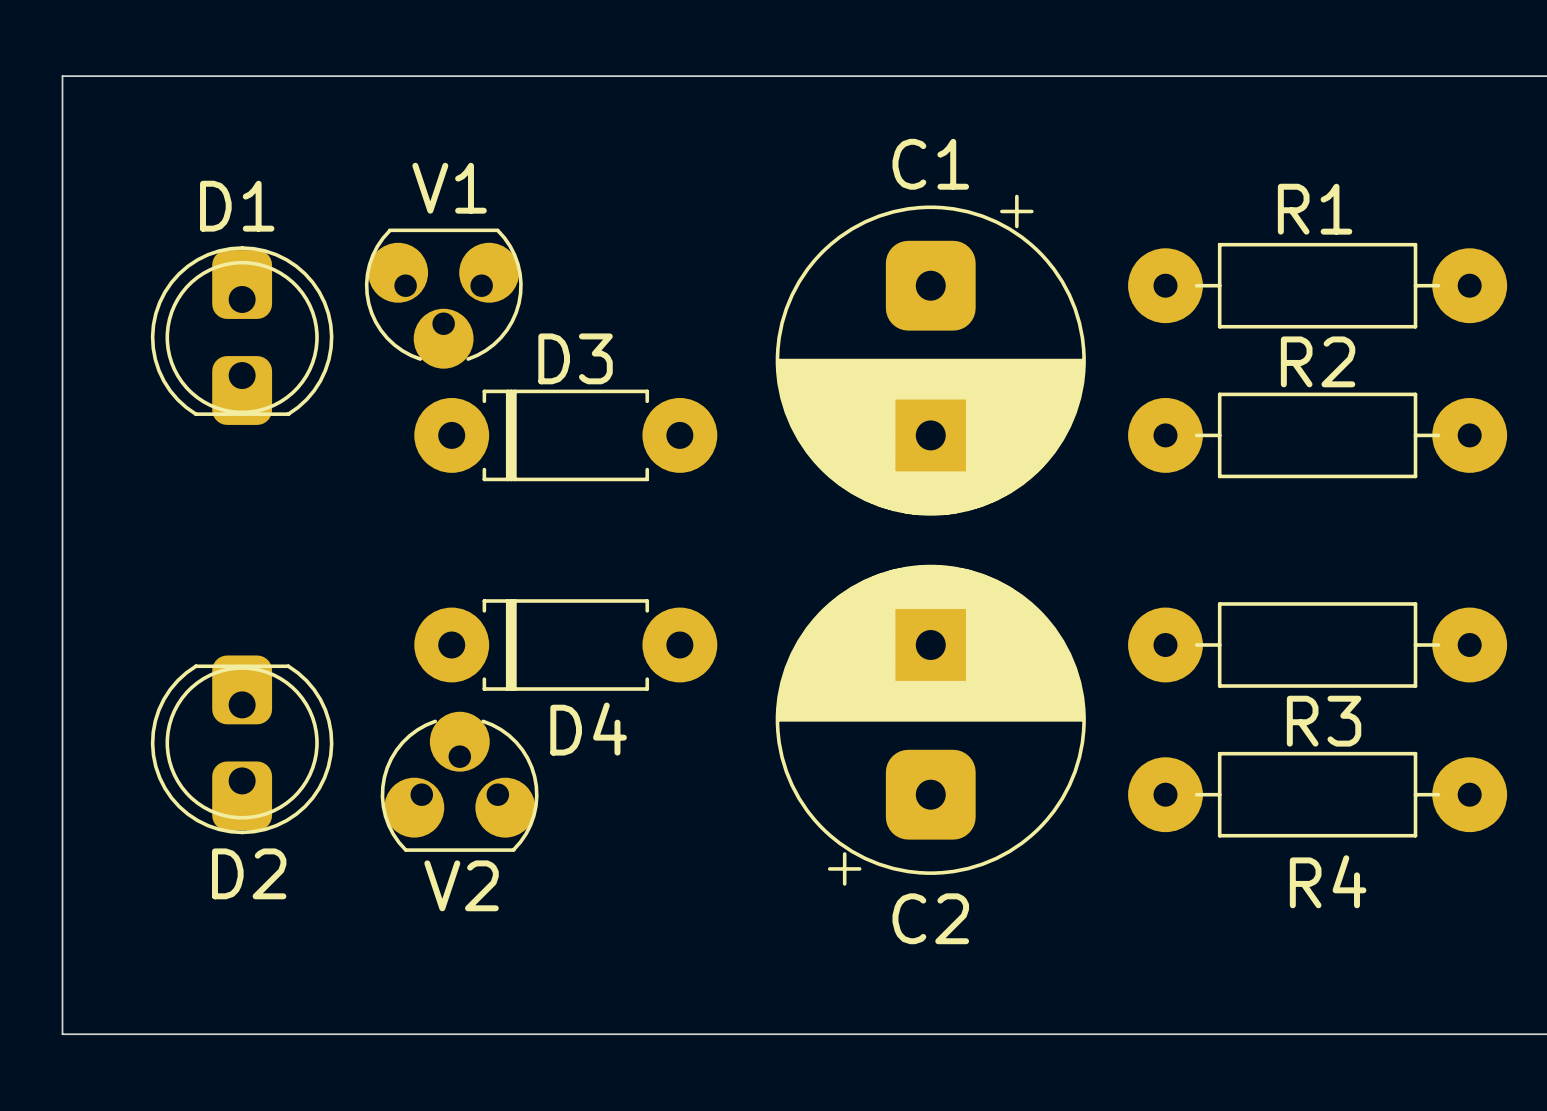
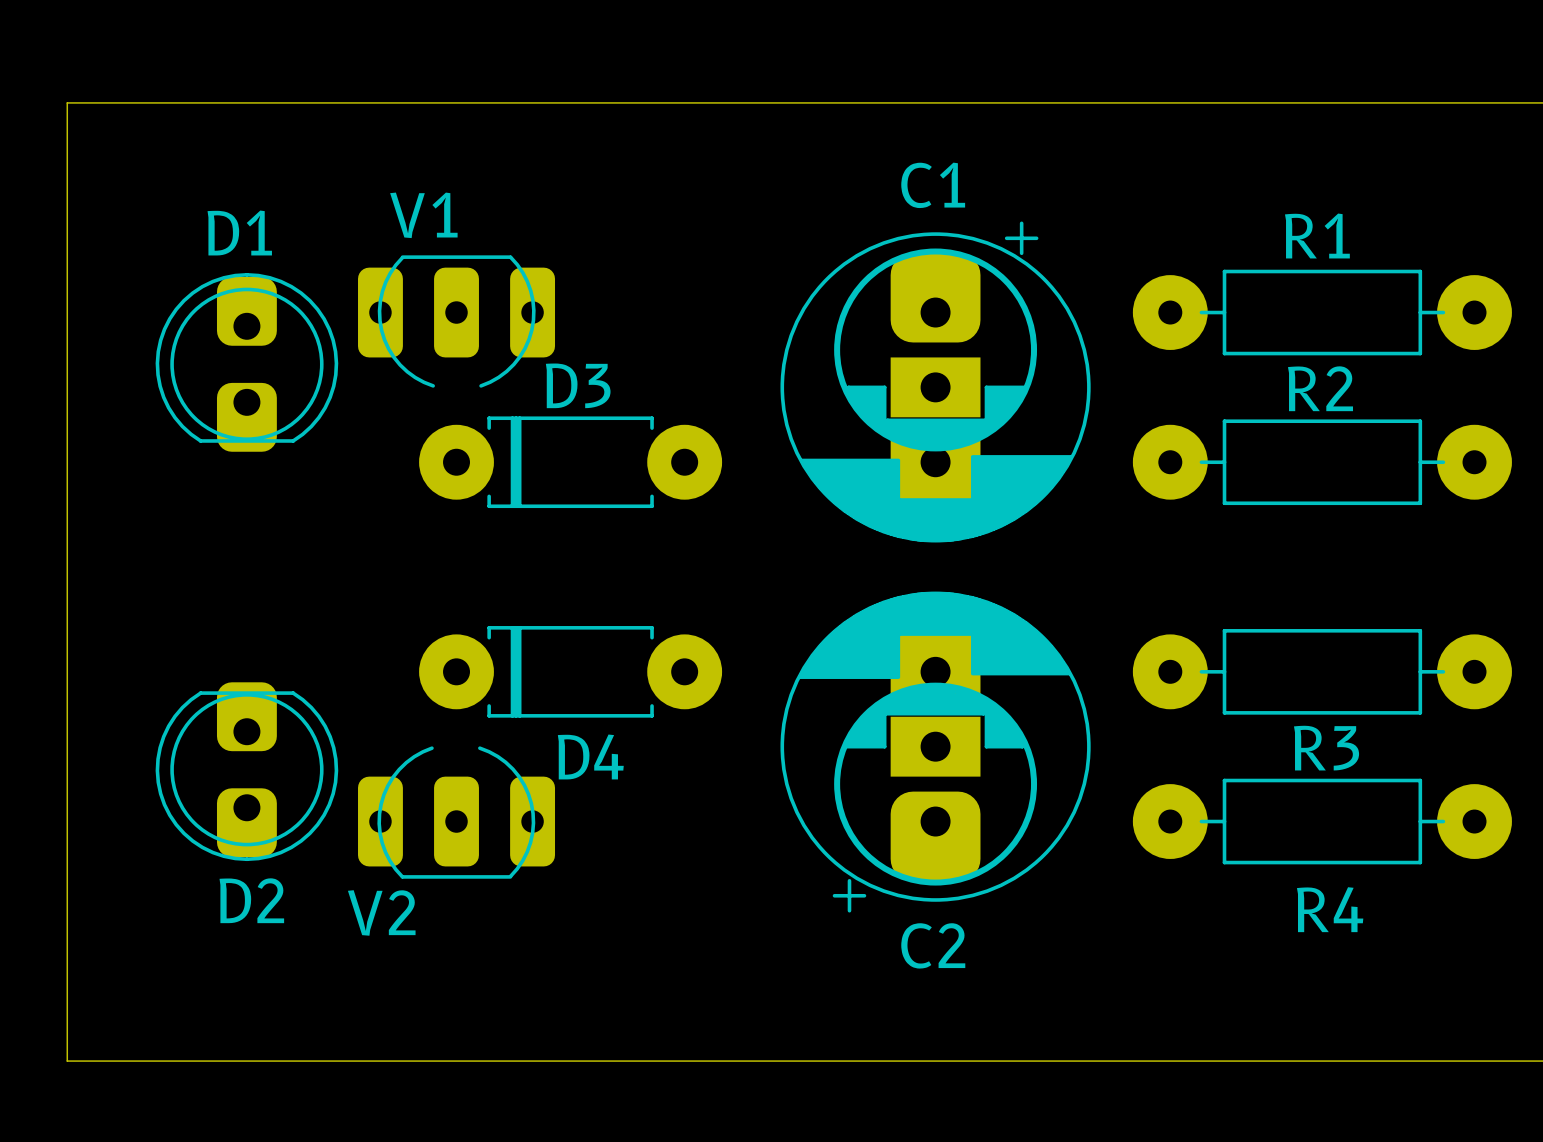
C1 footprint: [775, 194, 1086, 516] -> [780, 221, 1091, 543]
V1 footprint: [364, 228, 523, 369] -> [358, 255, 556, 388]
C2 footprint: [775, 564, 1086, 886] -> [780, 591, 1091, 913]
V2 footprint: [380, 711, 539, 852] -> [358, 746, 556, 879]
V2 name position: V2 (461, 885) -> V2 (381, 912)

